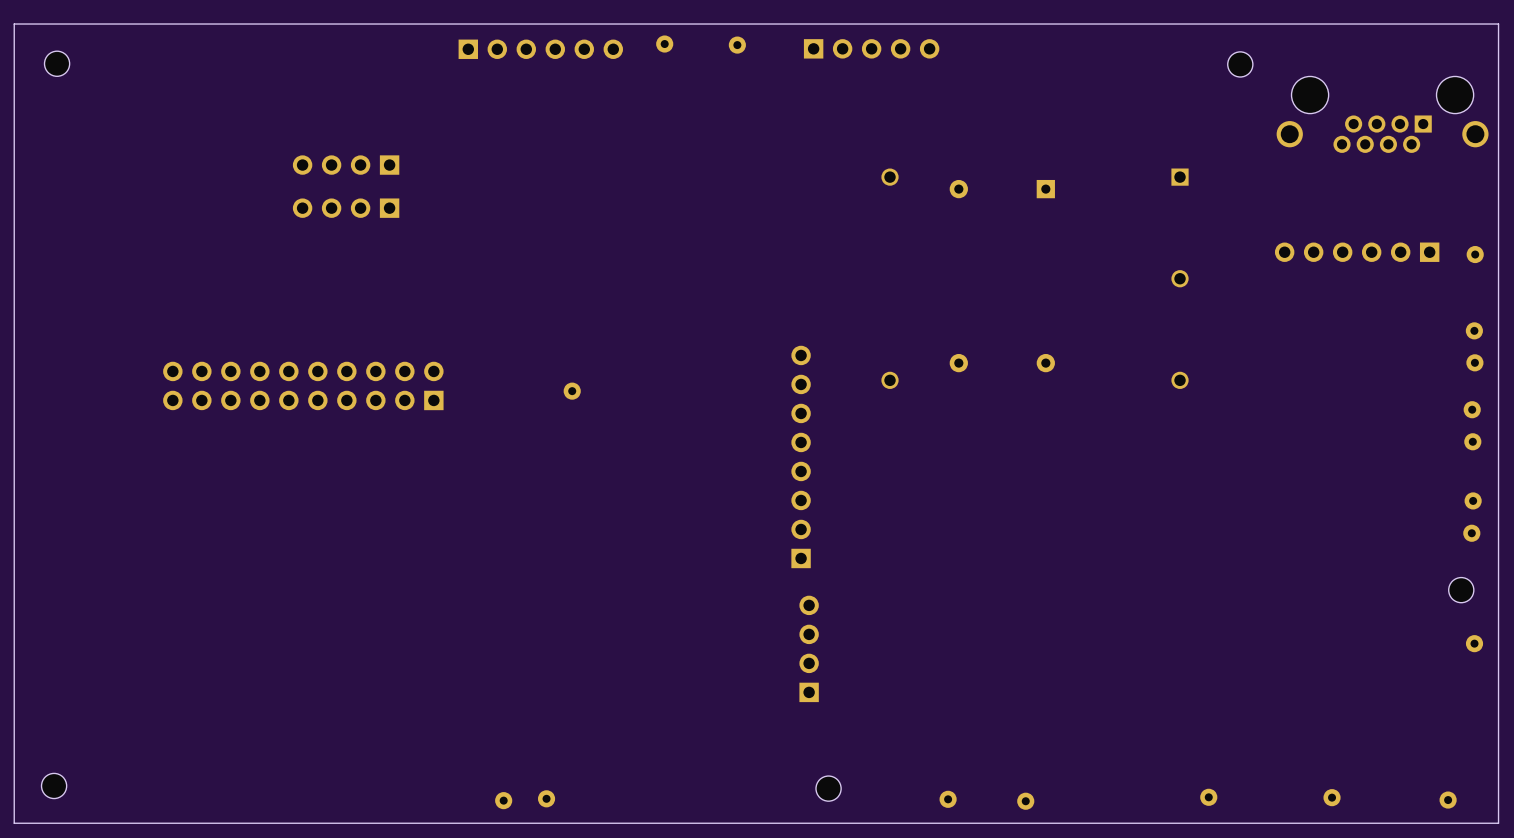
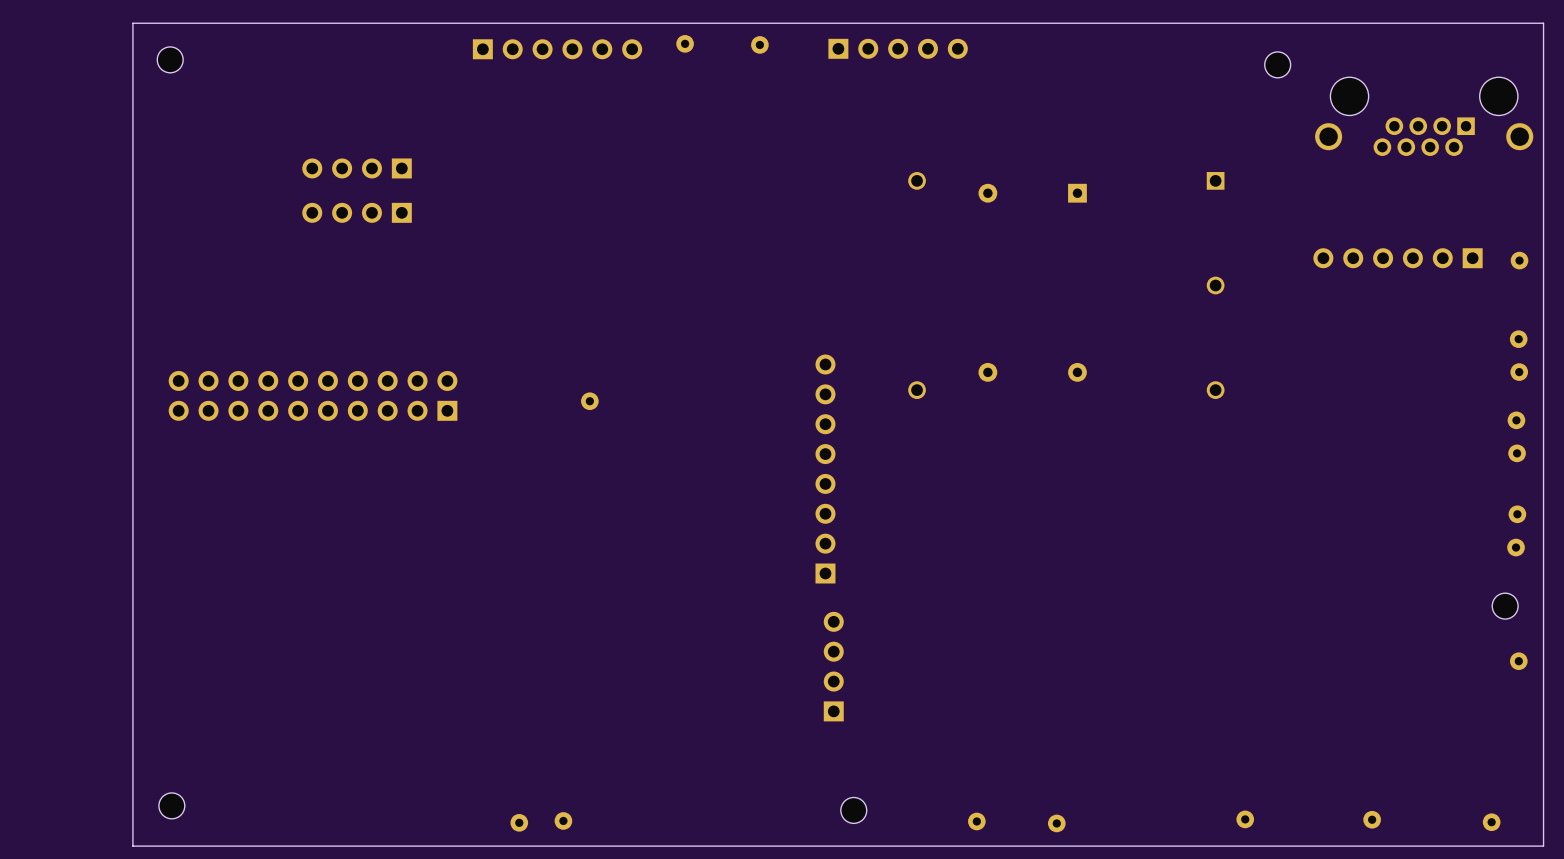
board edge: (128, 24) (14, 24) (14, 823) (128, 823) -> (132, 23) (132, 846)
part position: (57, 63) -> (170, 59)
part position: (54, 785) -> (171, 805)

